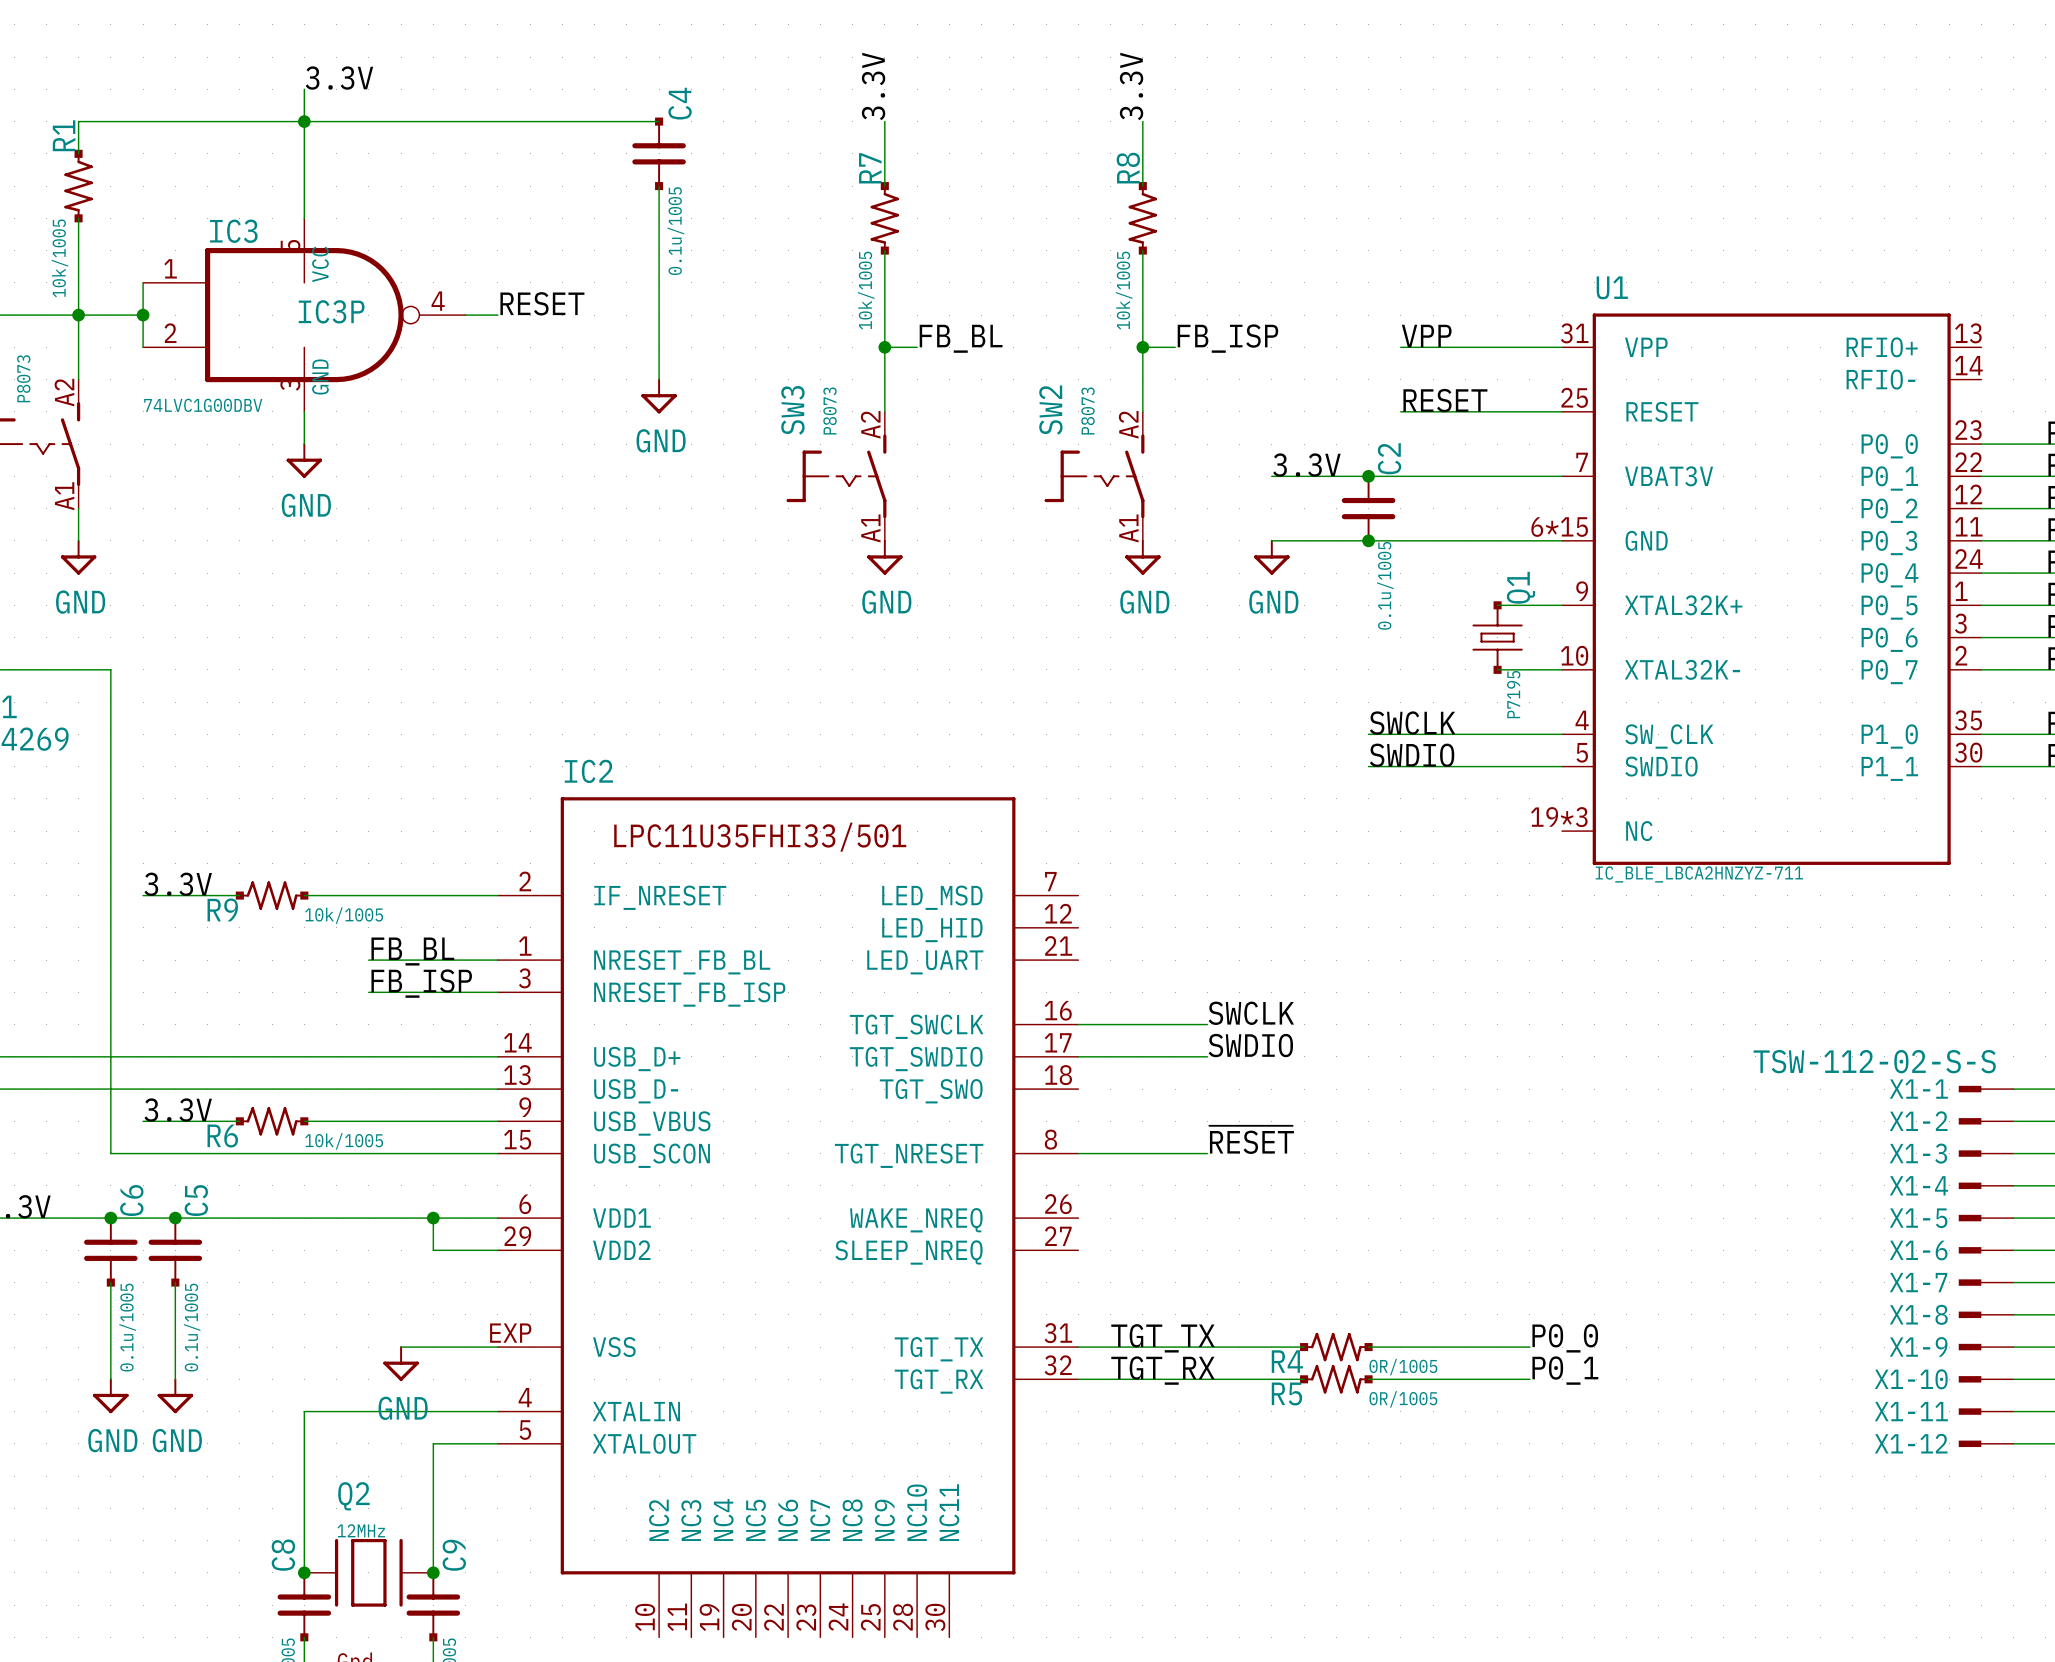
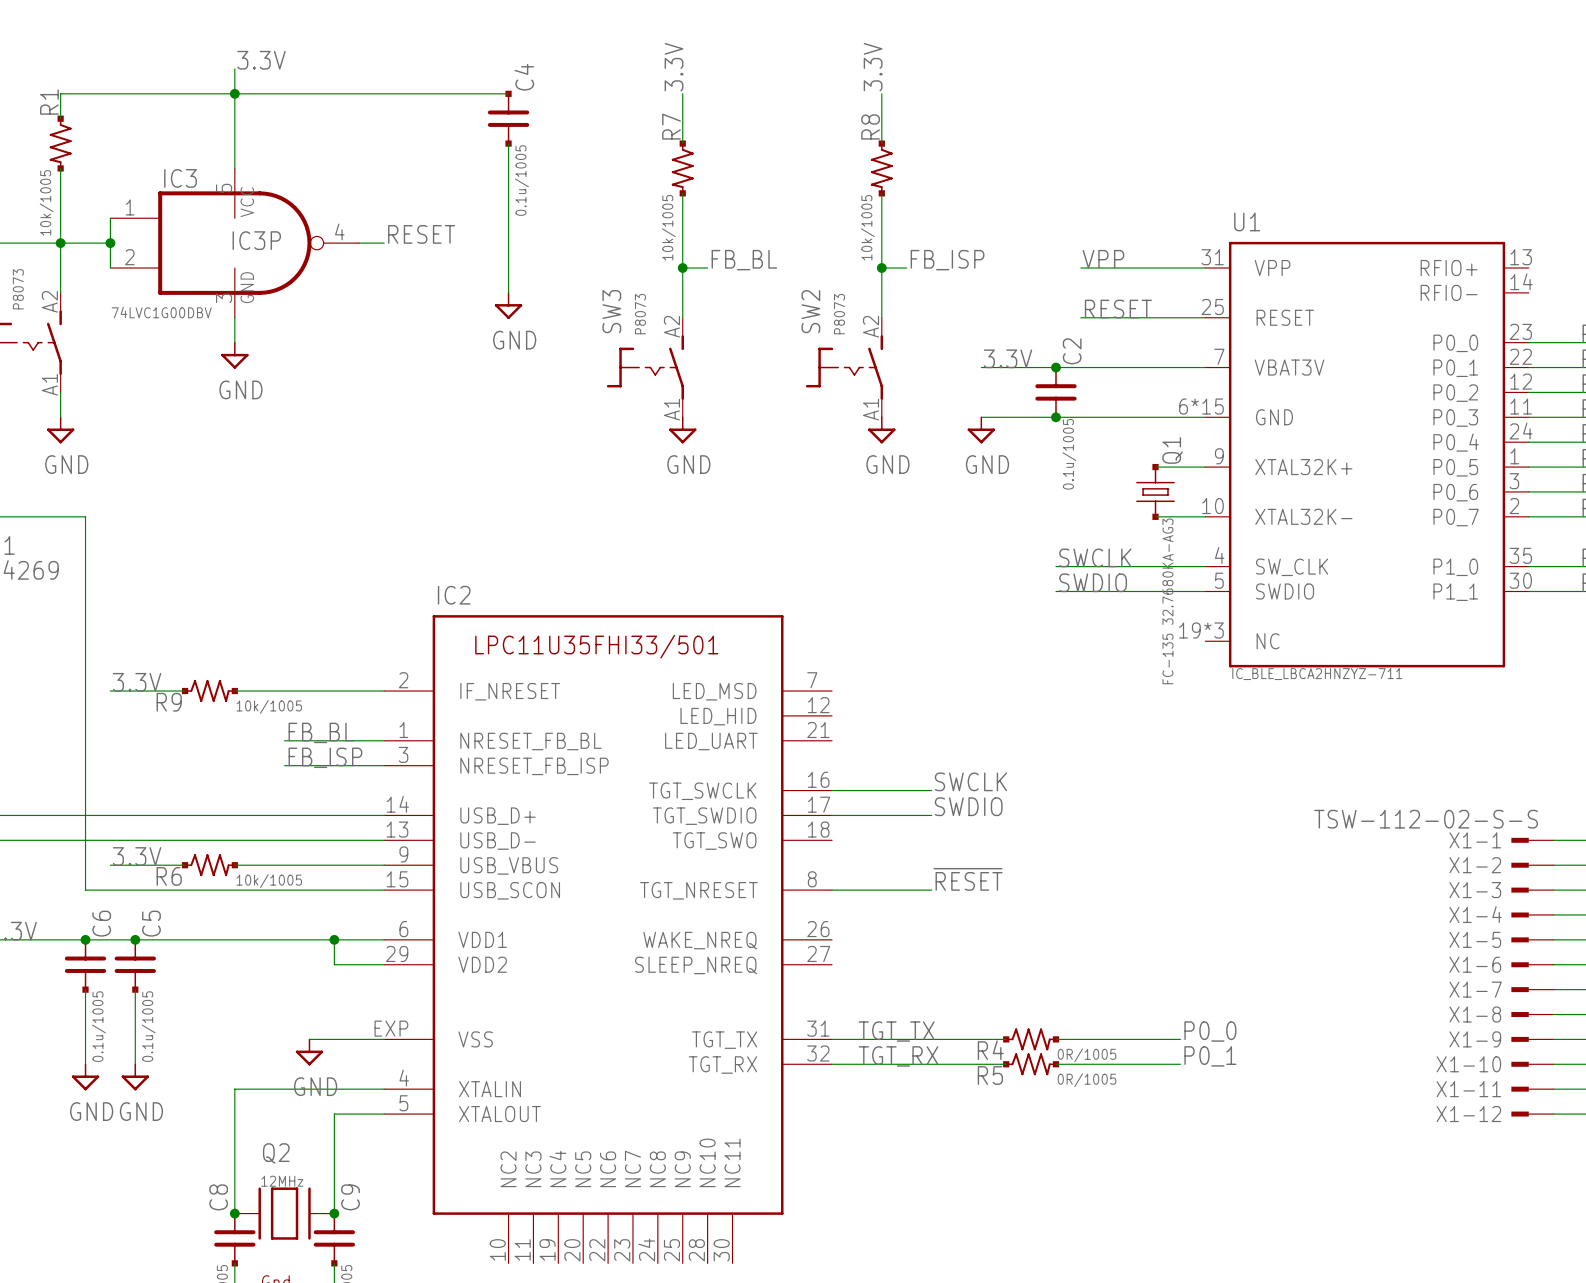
Q1 value: P7195 (1513, 694) -> FC-135 32.7680KA-AG3 (1167, 601)

